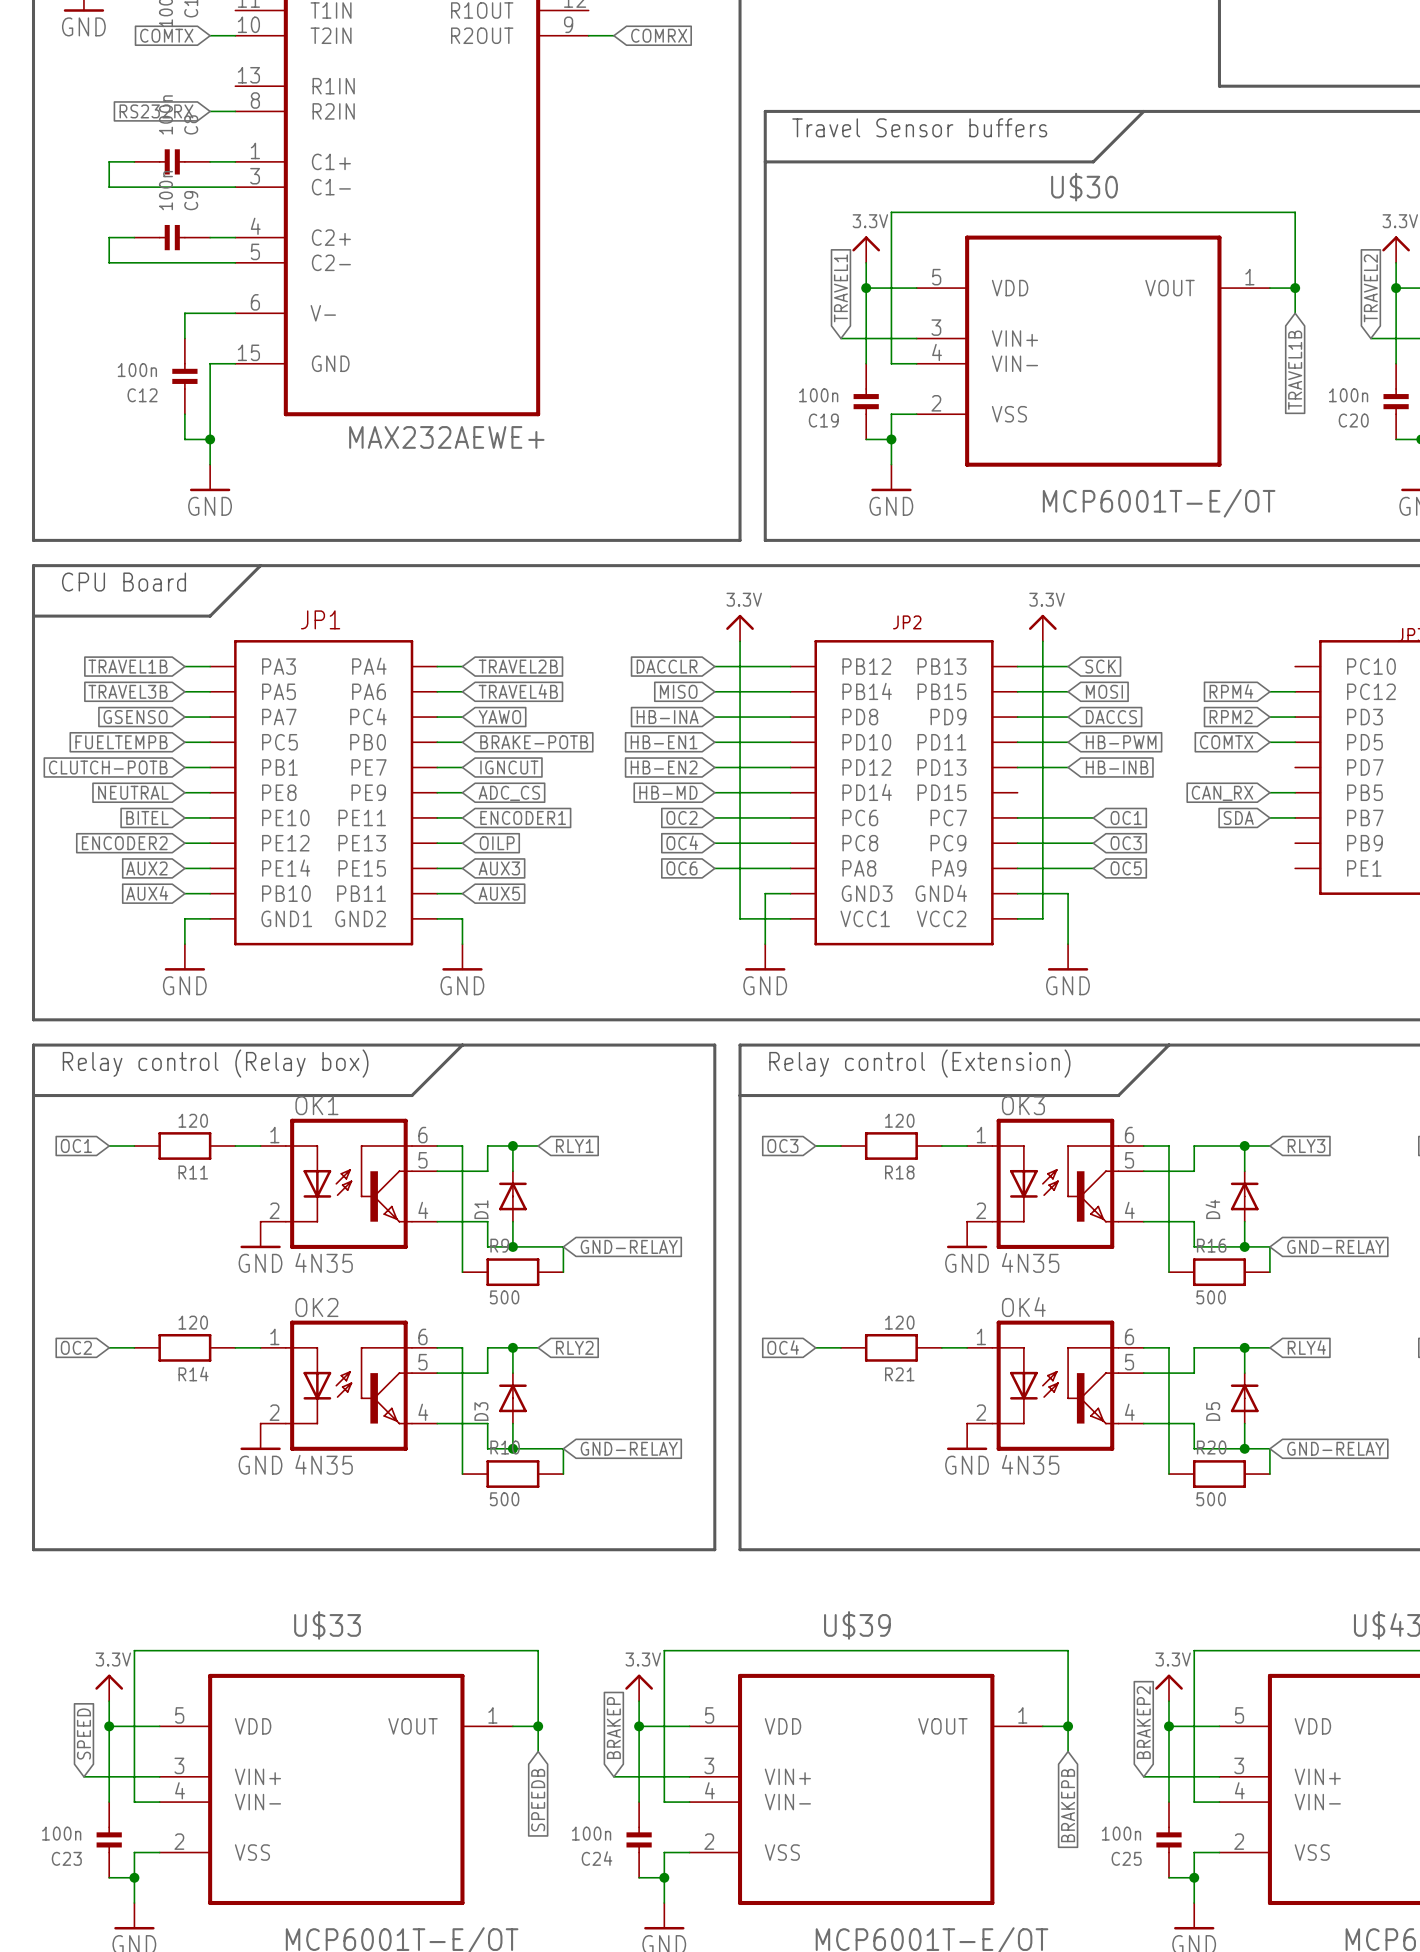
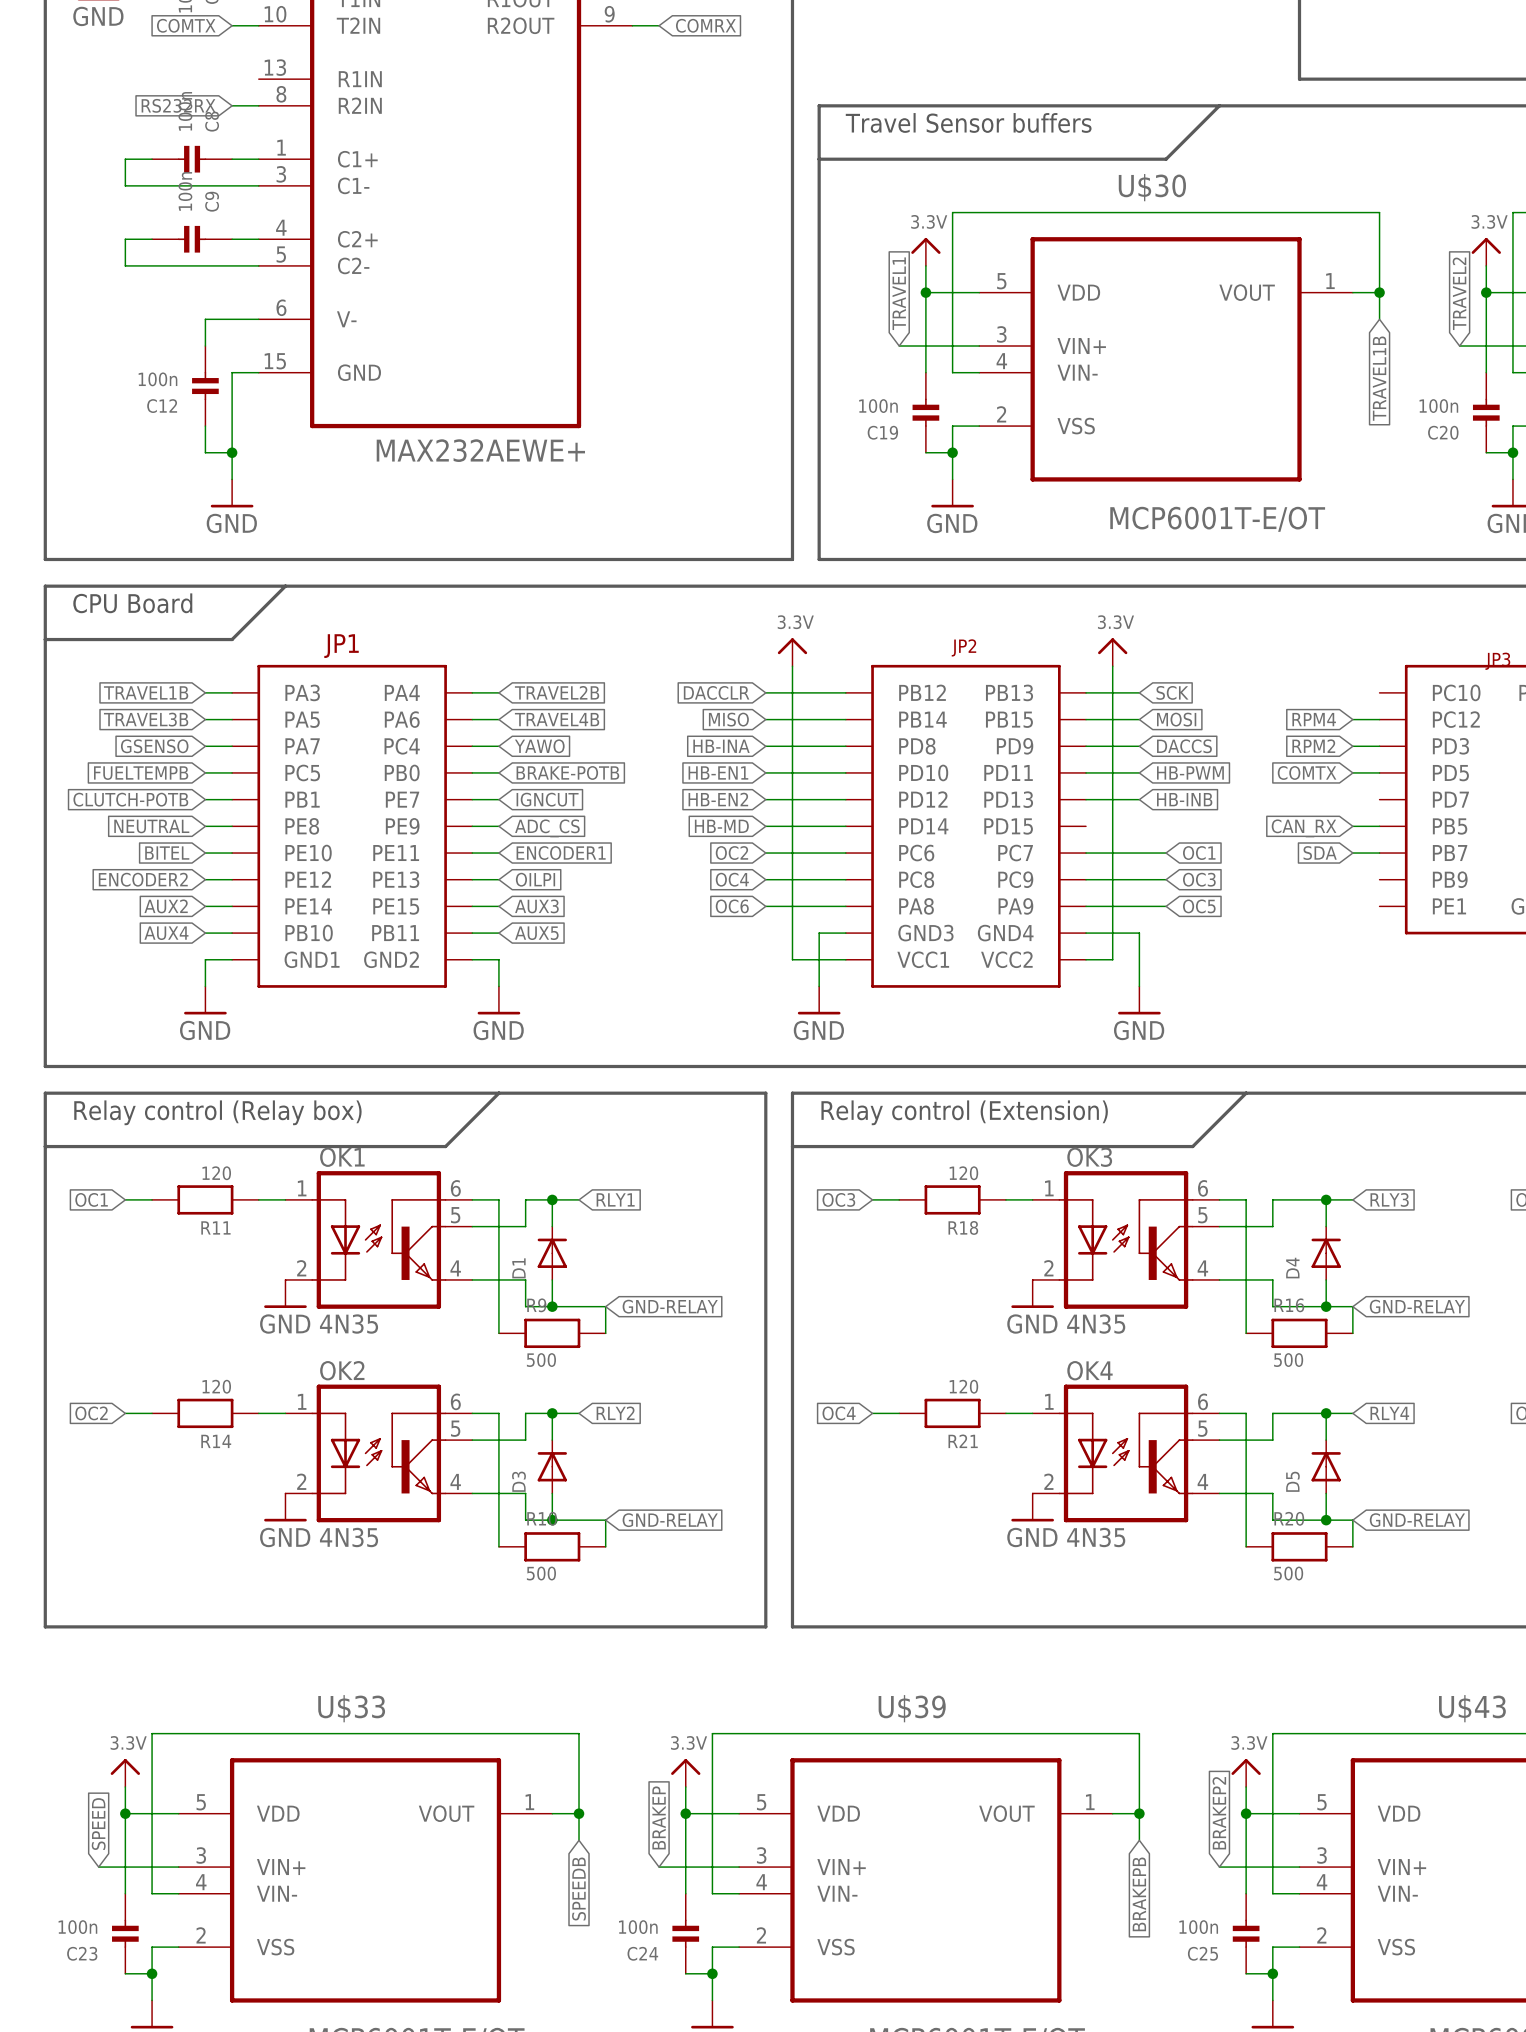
global label: OILP (497, 843) -> OILPI (535, 879)

